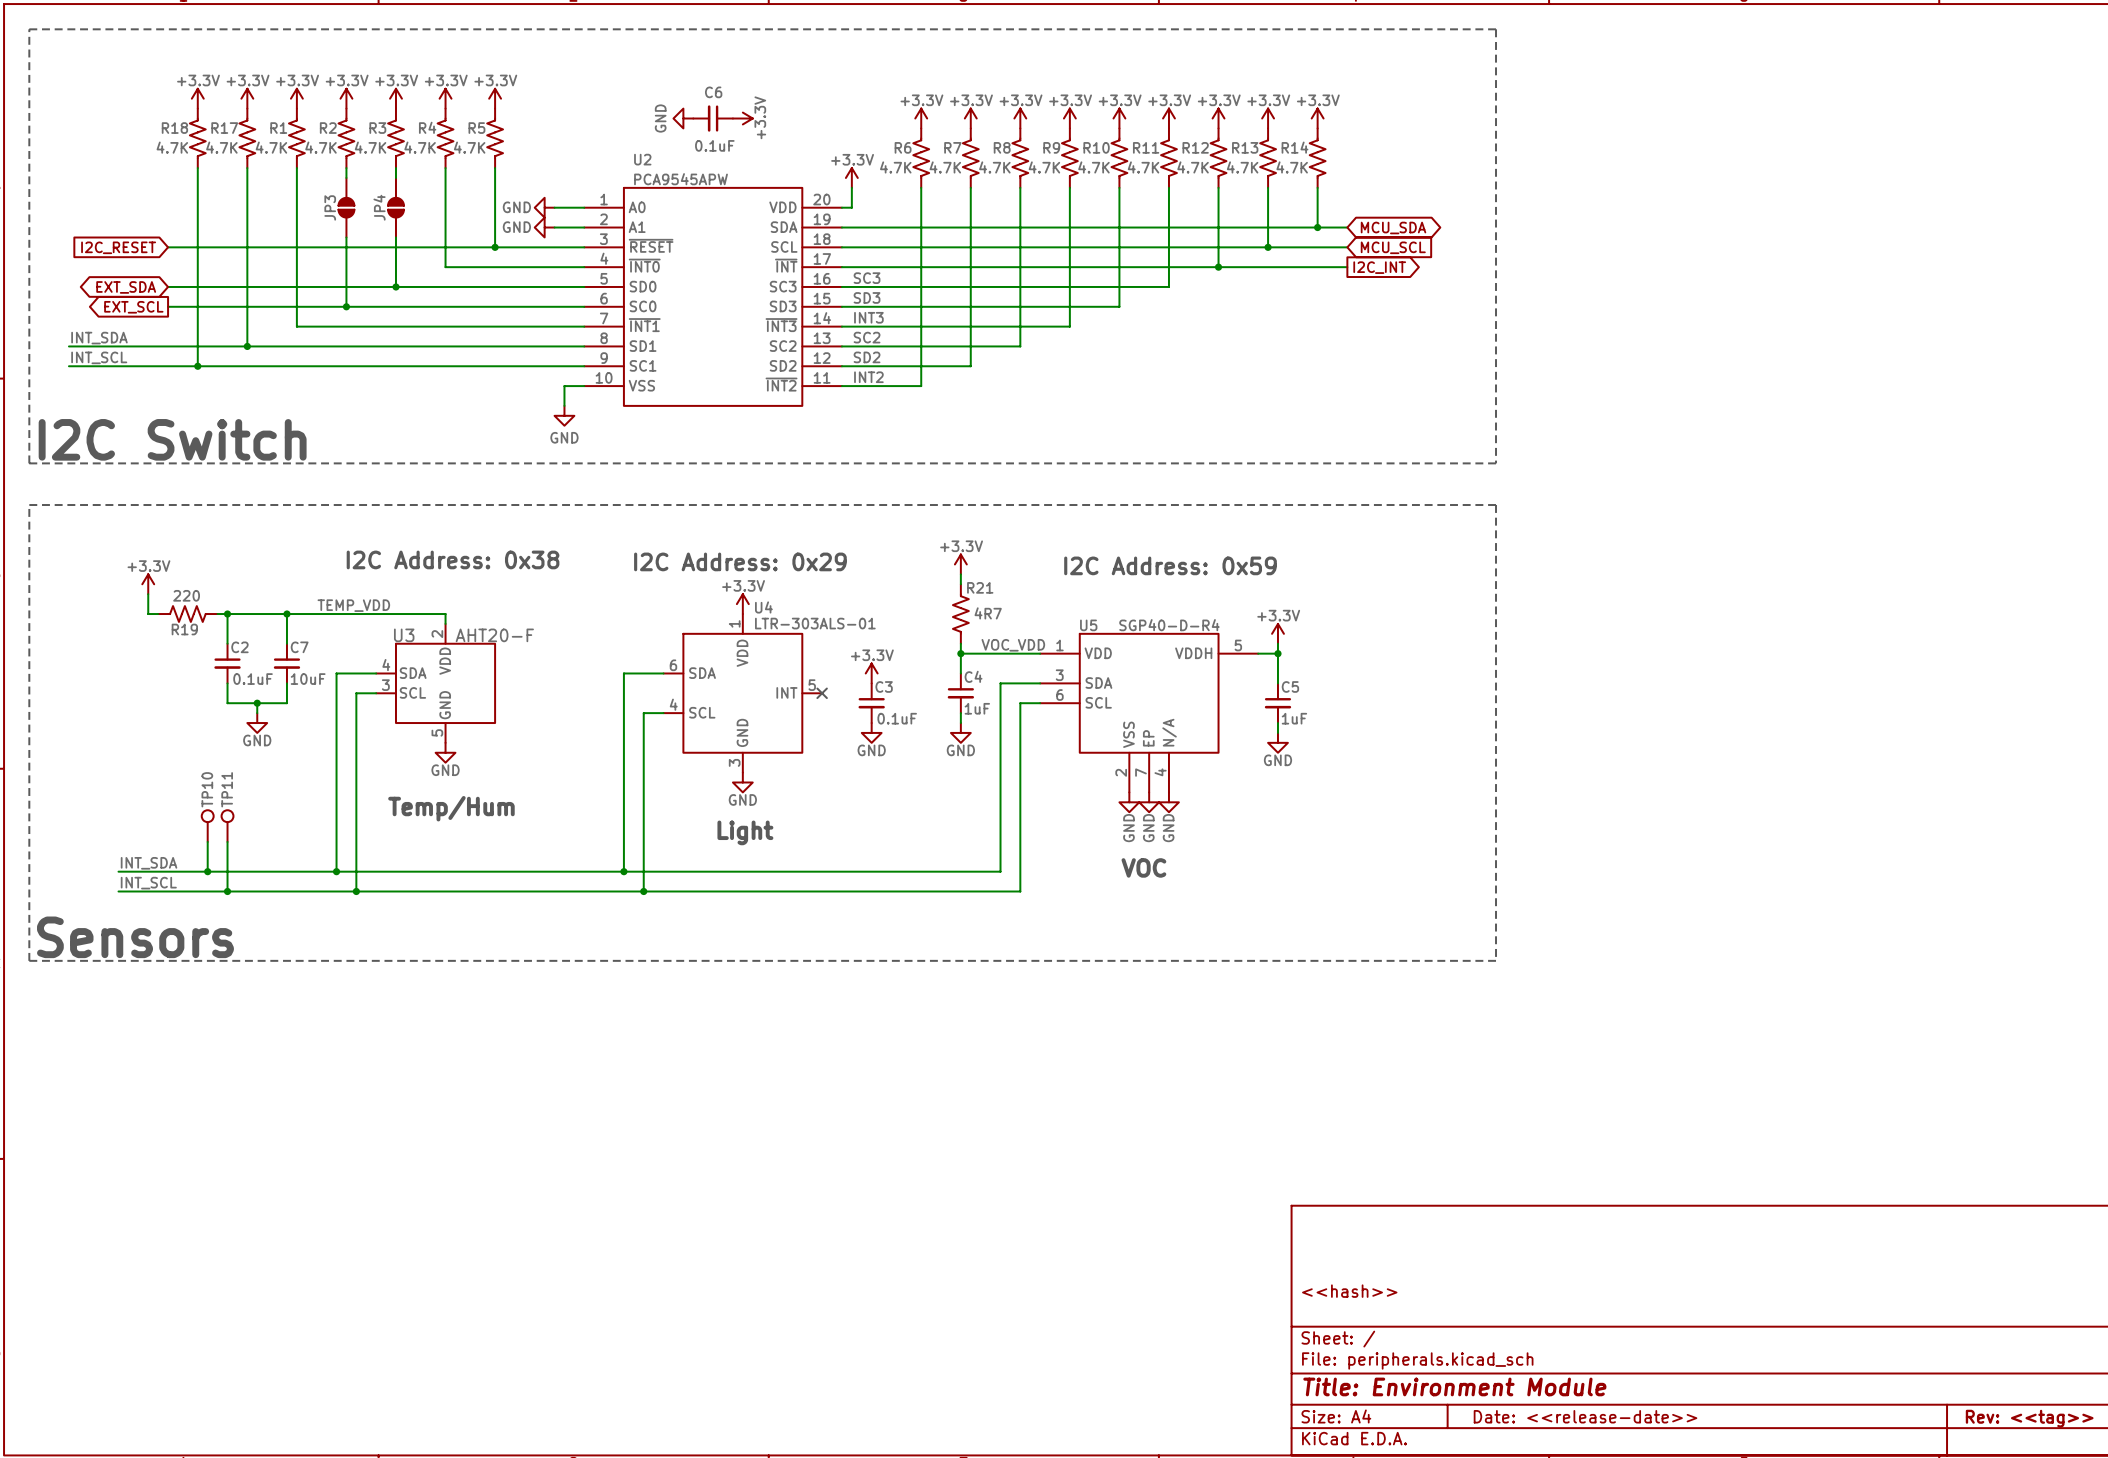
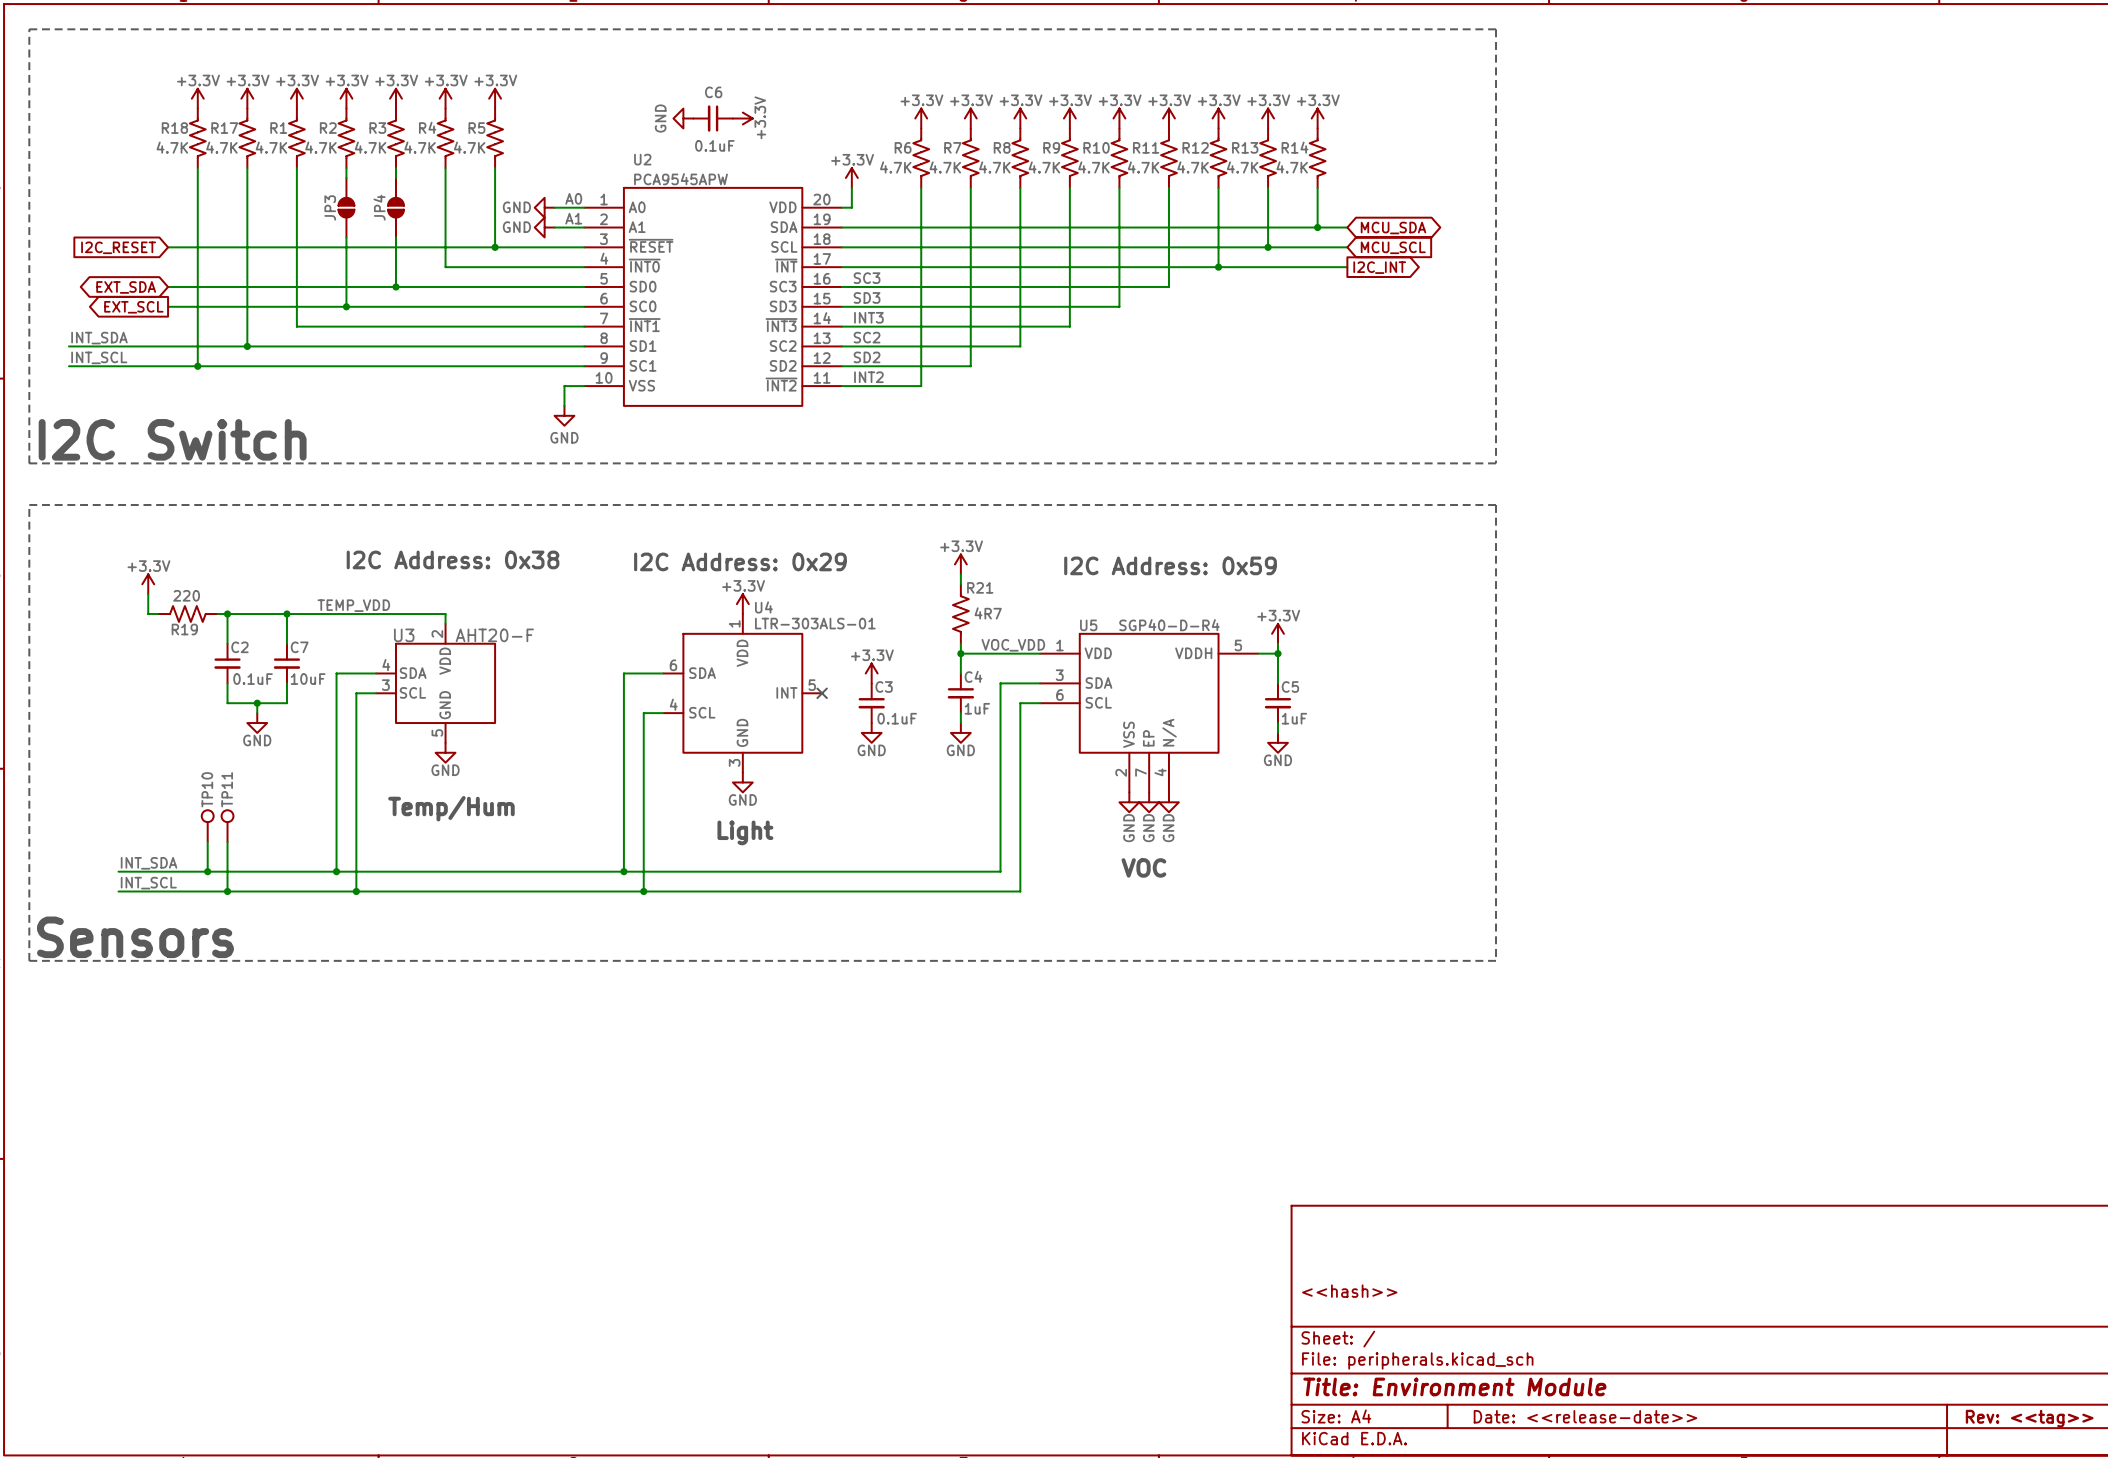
label: none -> A0 (573, 198)
label: none -> A1 (573, 218)

